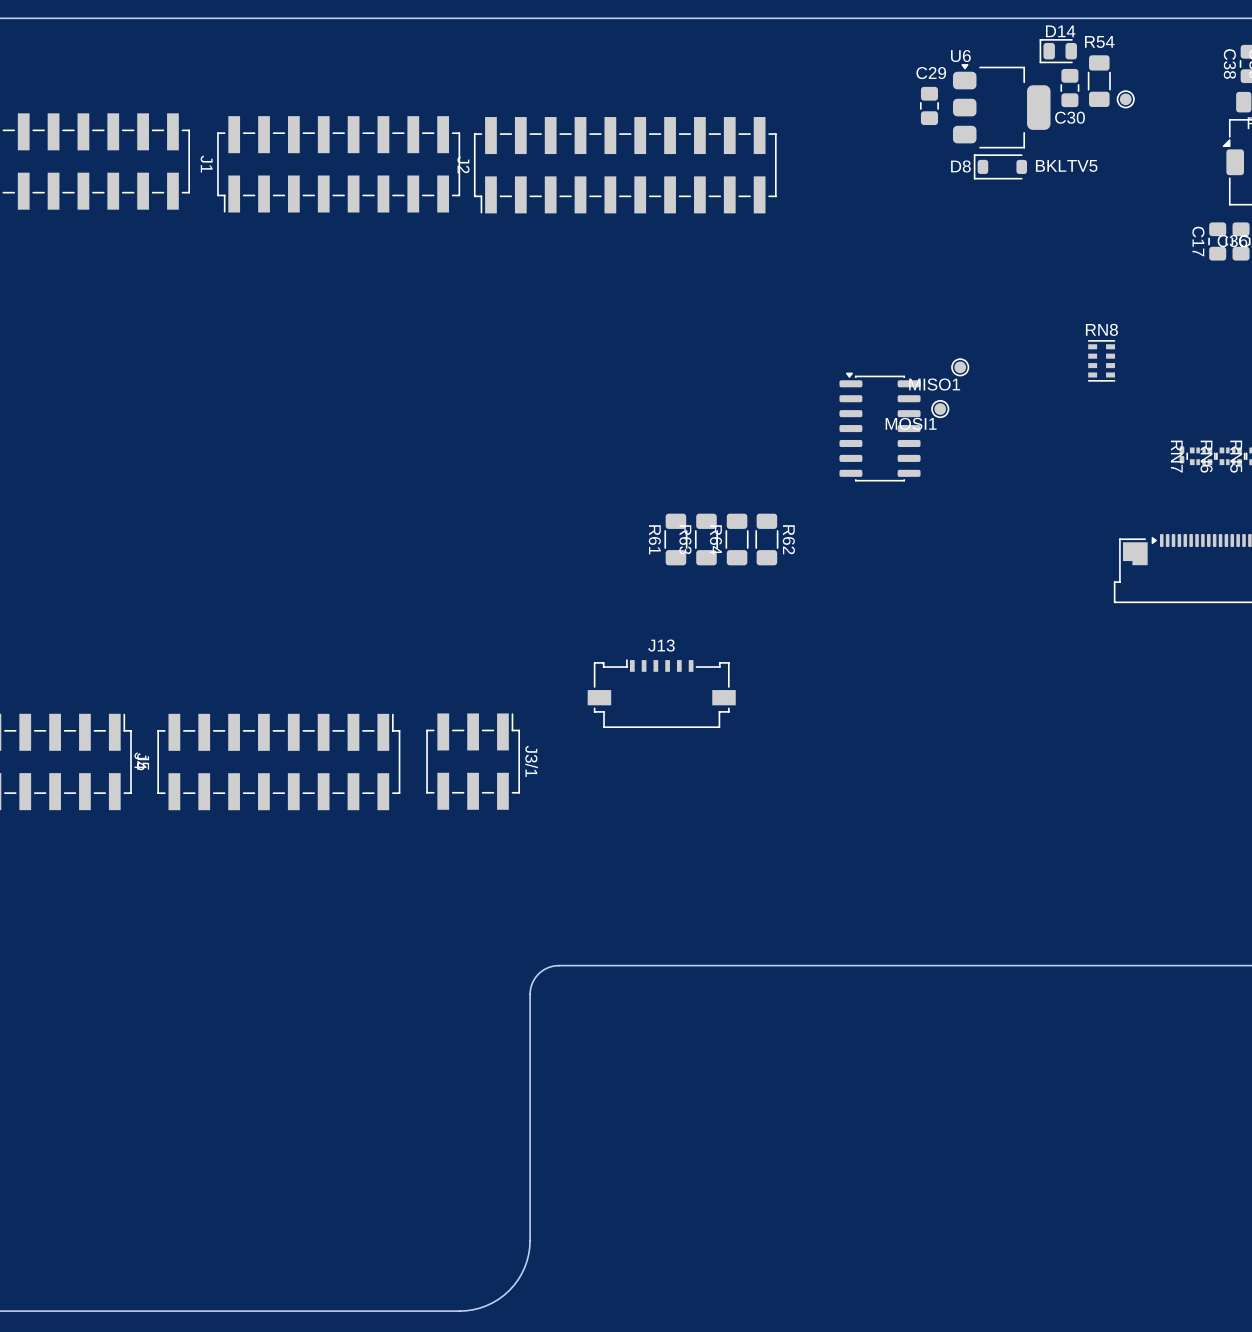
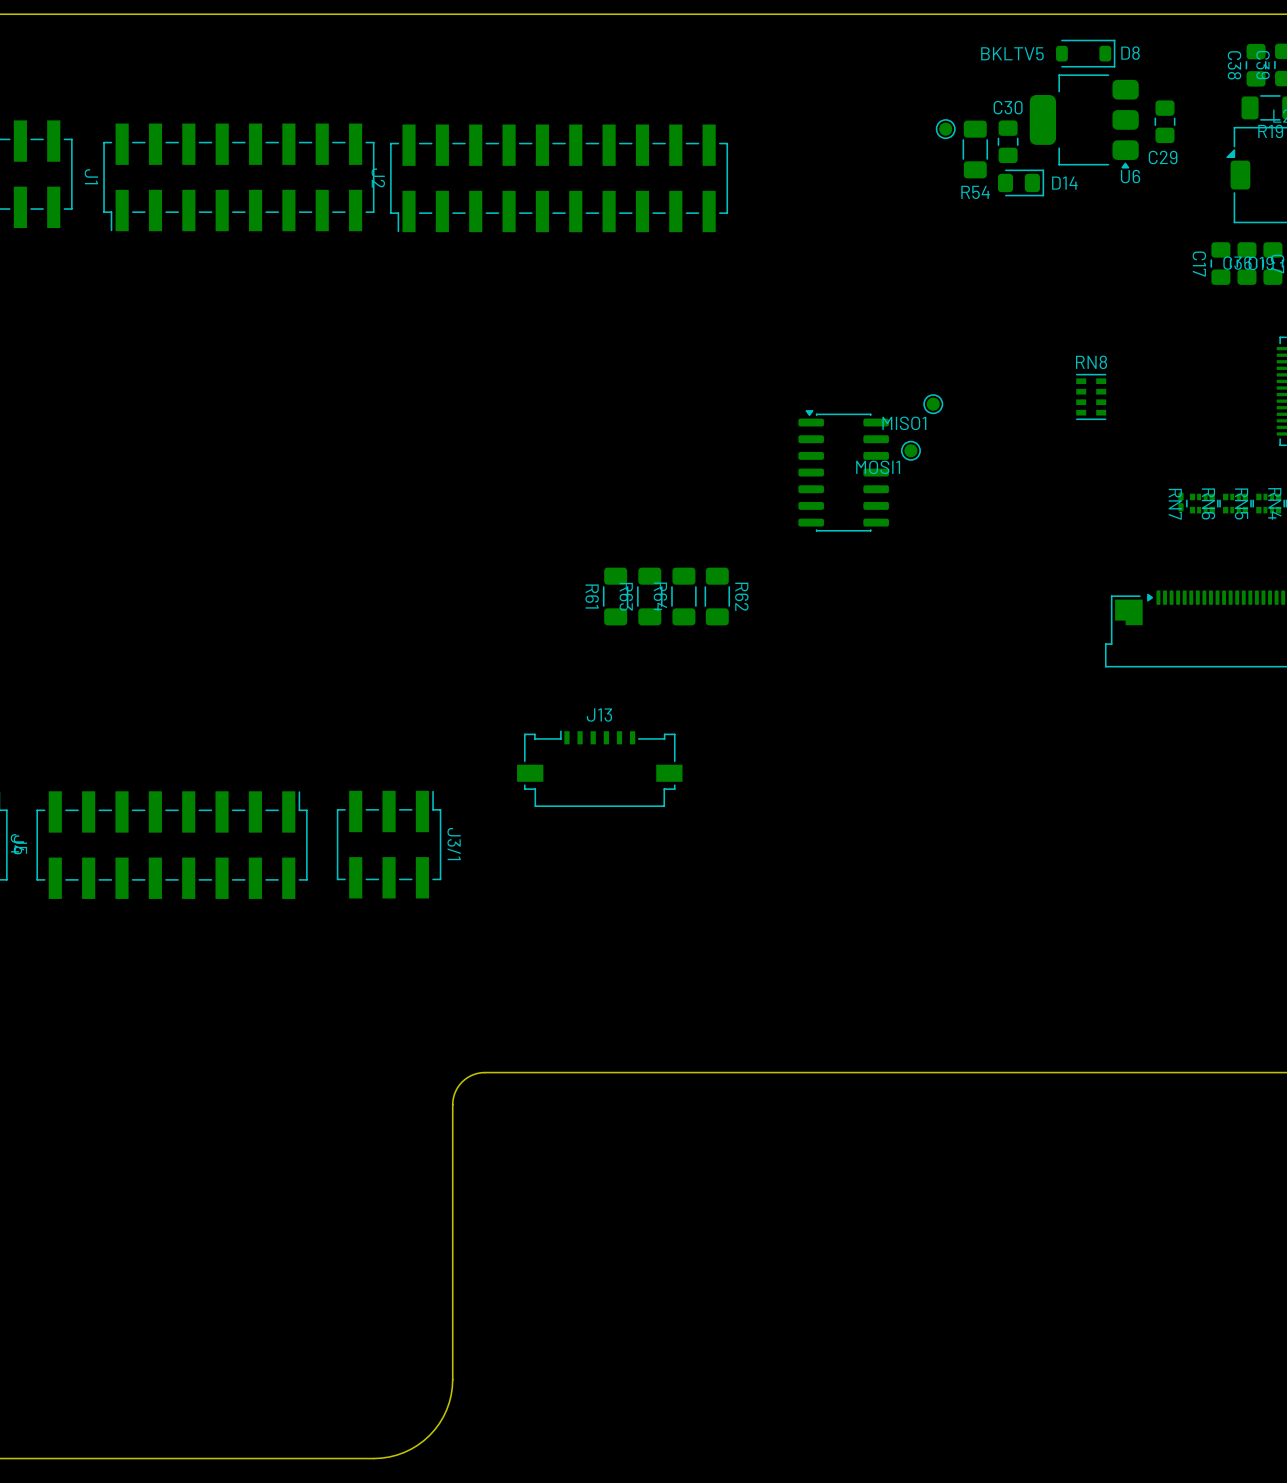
D14 name position: D14 (1060, 31) -> D14 (1064, 183)
D14 footprint: [1039, 39, 1077, 64] -> [997, 169, 1045, 197]
R54 name position: R54 (1099, 41) -> R54 (975, 192)
C29 name position: C29 (931, 73) -> C29 (1163, 157)
R54 position: (1099, 81) -> (975, 149)
C30 position: (1069, 88) -> (1008, 141)
BKLTV5 position: (1125, 99) -> (945, 129)
C29 position: (929, 105) -> (1164, 121)
U6 rotation: 0° (1001, 106) -> 180° (1084, 121)
U6 position: (1001, 106) -> (1084, 121)
C30 name position: C30 (1070, 117) -> C30 (1008, 107)
BKLTV5 name position: BKLTV5 (1066, 165) -> BKLTV5 (1012, 53)
D8 rotation: 0° (1000, 166) -> 180° (1085, 53)
D8 position: (1000, 166) -> (1085, 53)

